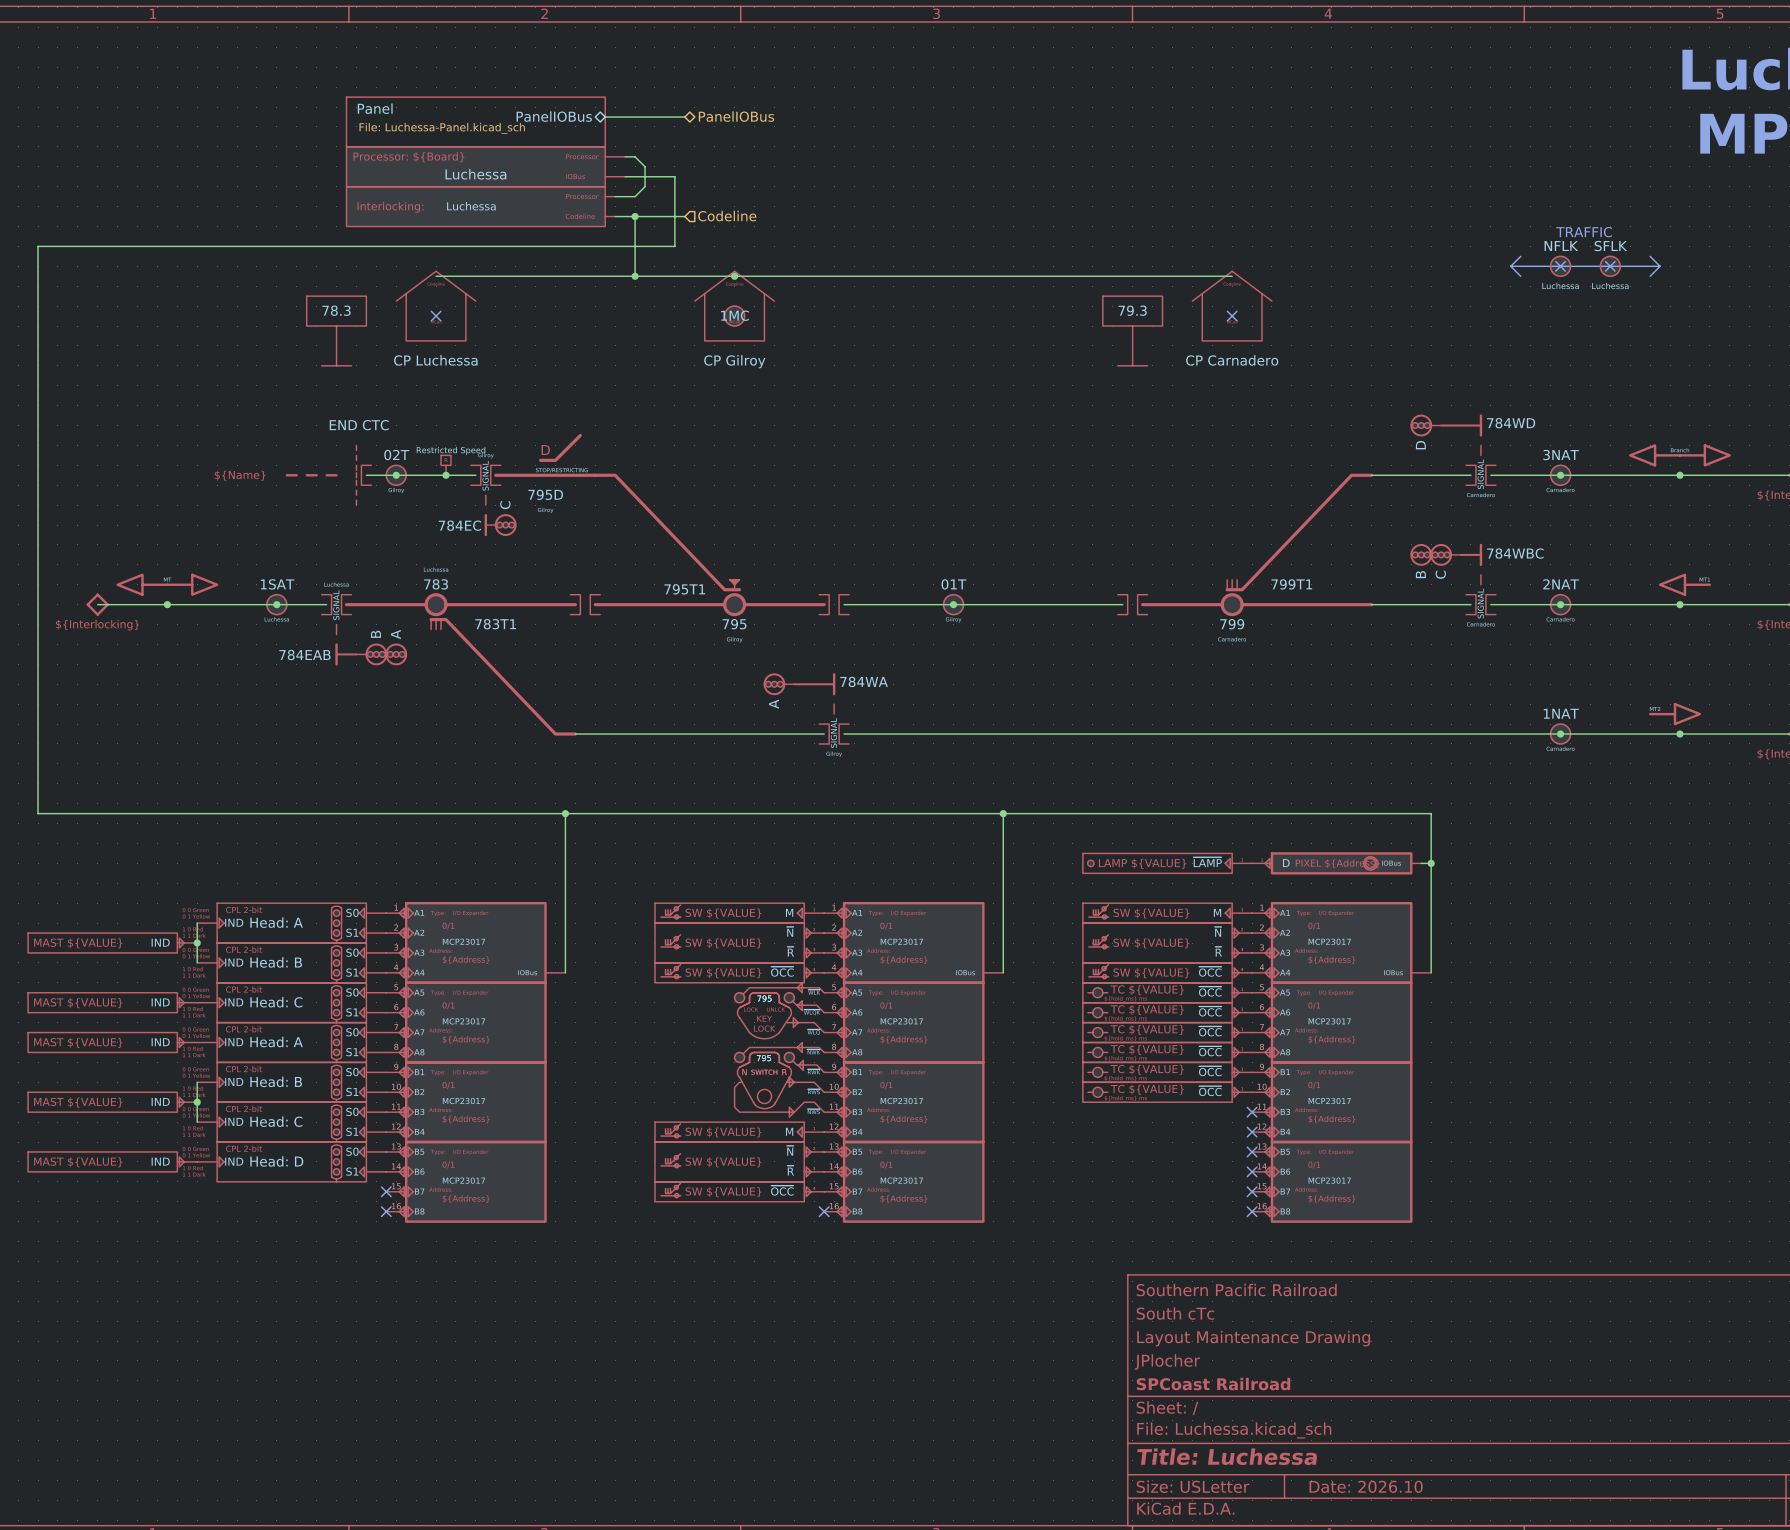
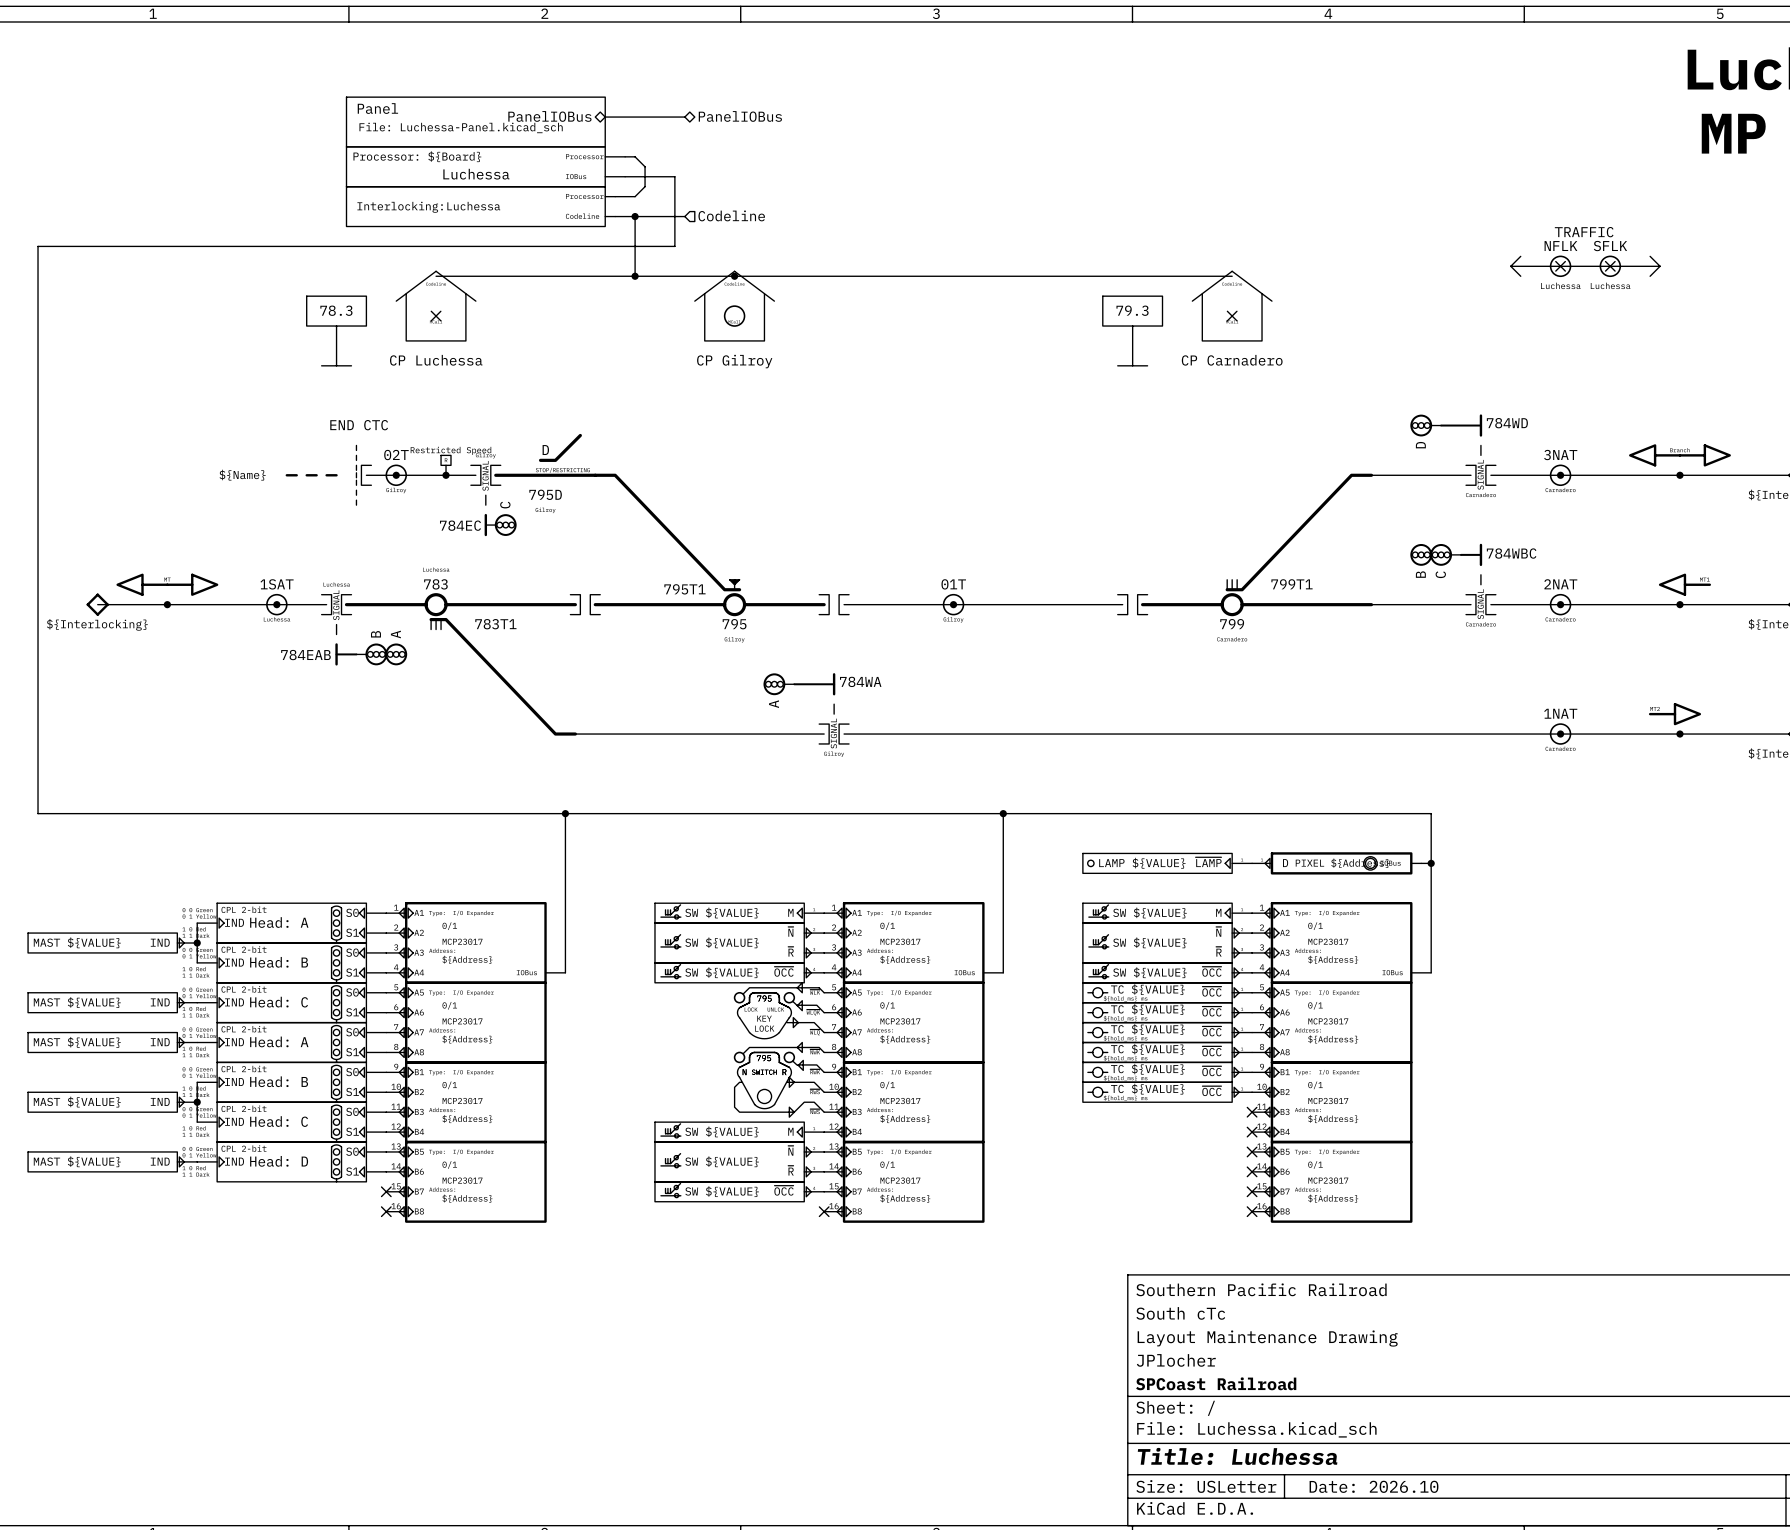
part text: 1MC (734, 315) -> none

